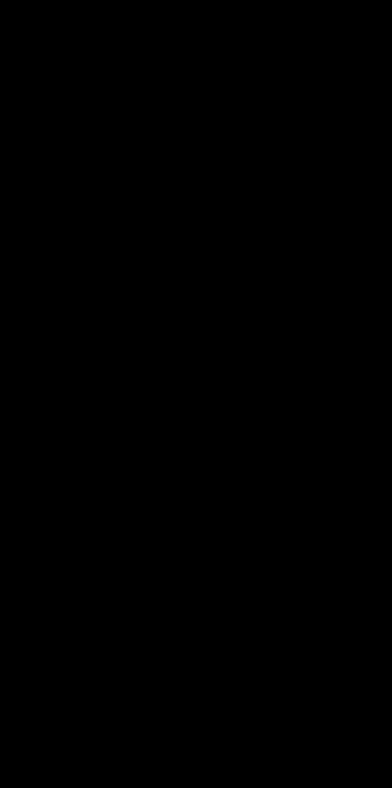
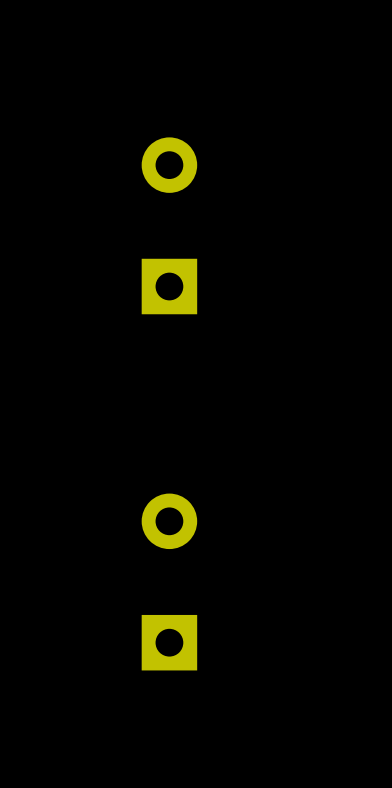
part: none -> (169, 225)
part: none -> (169, 582)

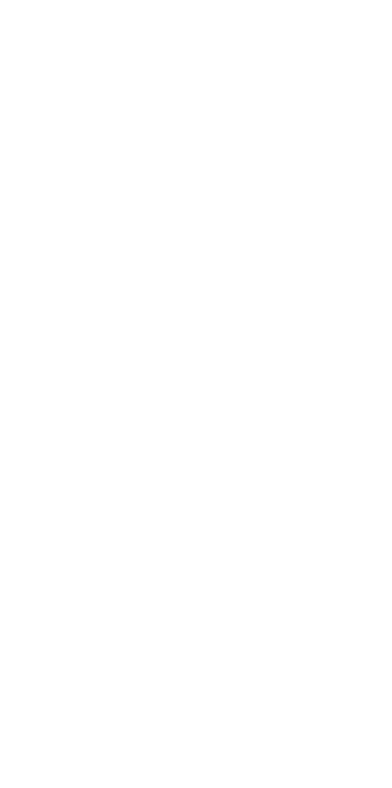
part: (169, 225) -> none
part: (169, 582) -> none

